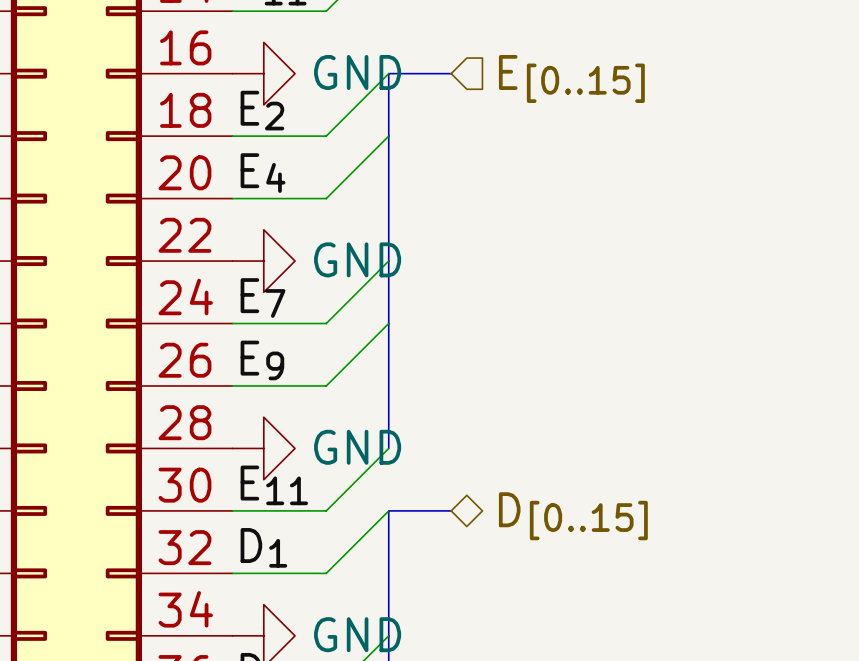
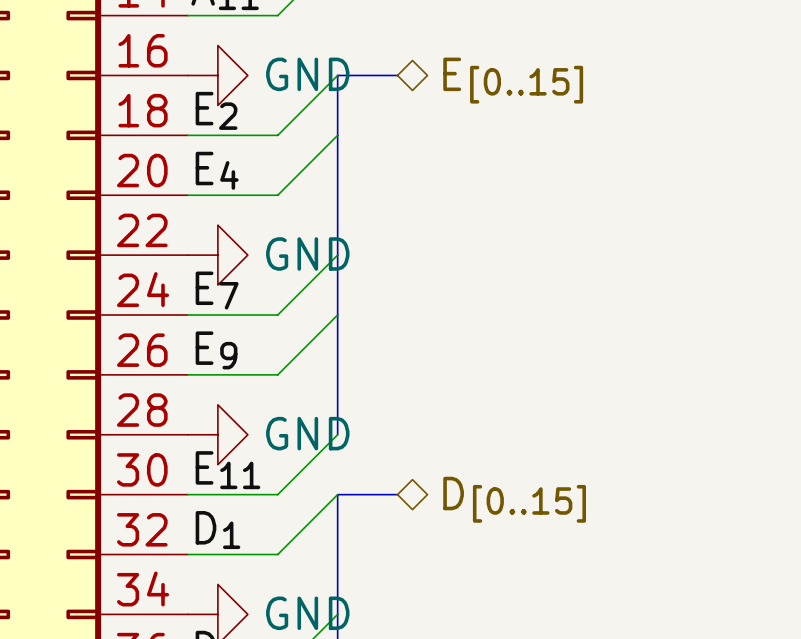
hierarchical label shape: input (571, 78) -> bidirectional (513, 80)

